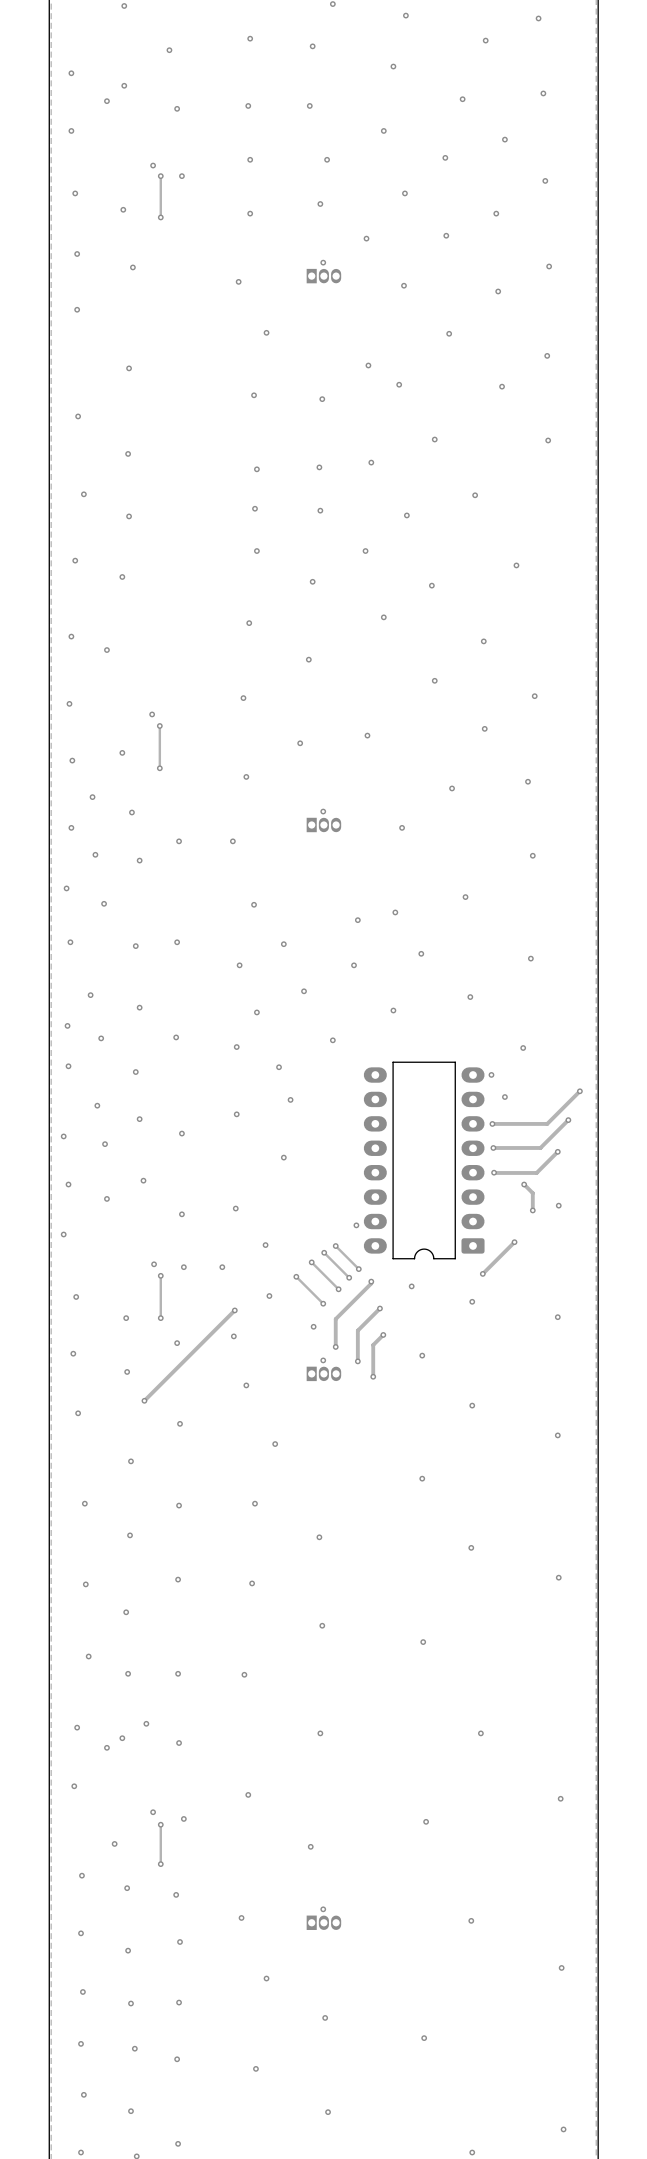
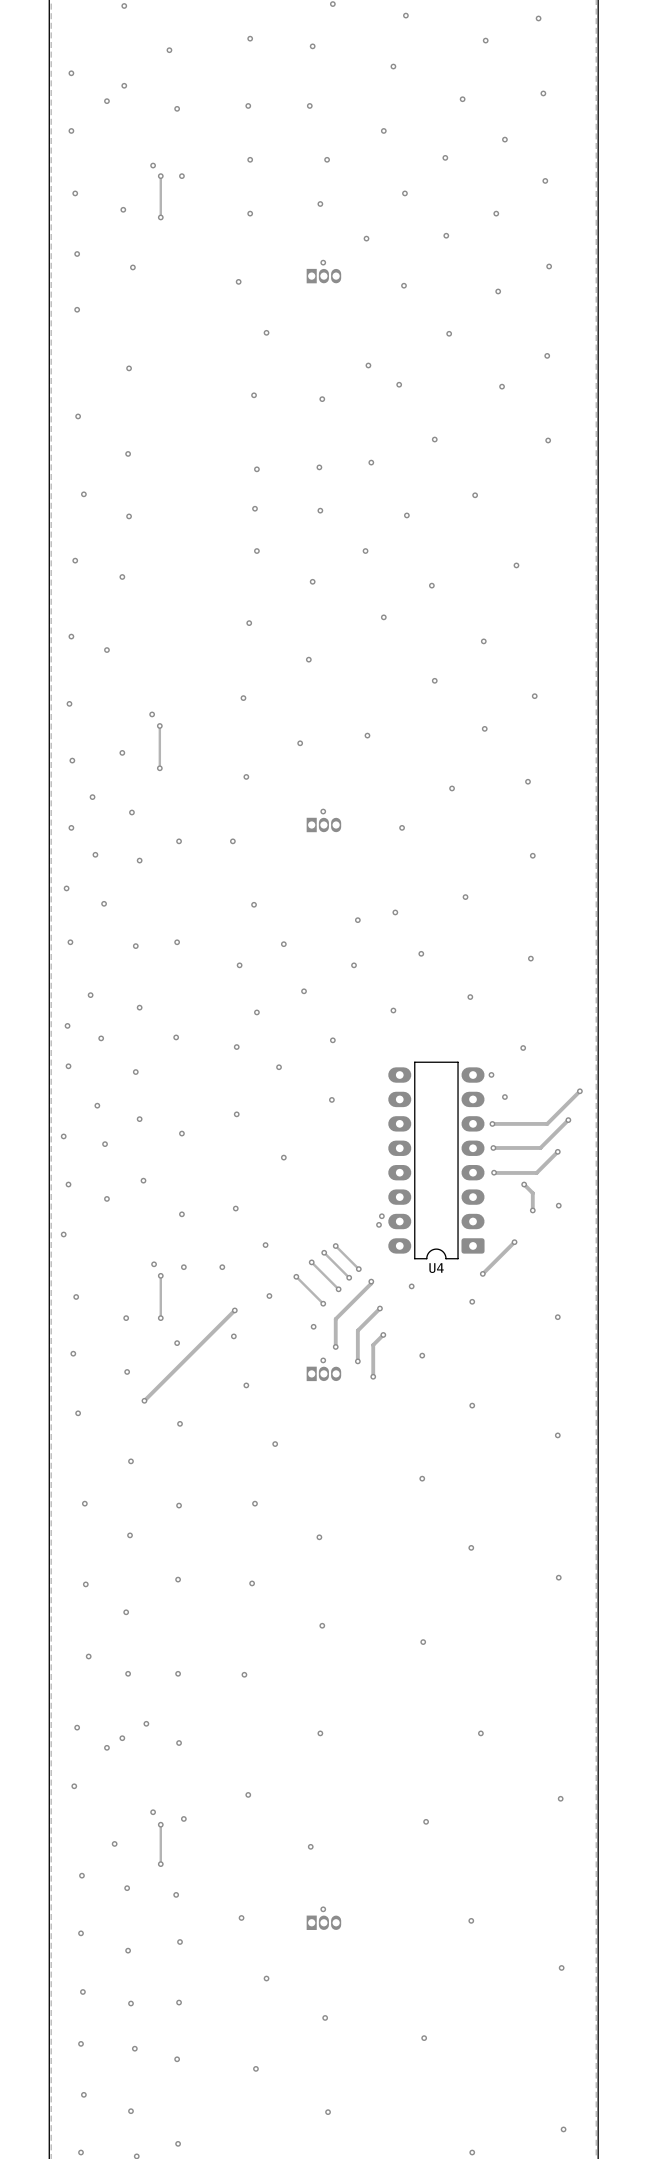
via position: (290, 1099) -> (331, 1099)
part: (424, 1160) -> none
U4: none -> (436, 1160)
via: none -> (381, 1216)
via: none -> (379, 1224)
via: (356, 1225) -> none

